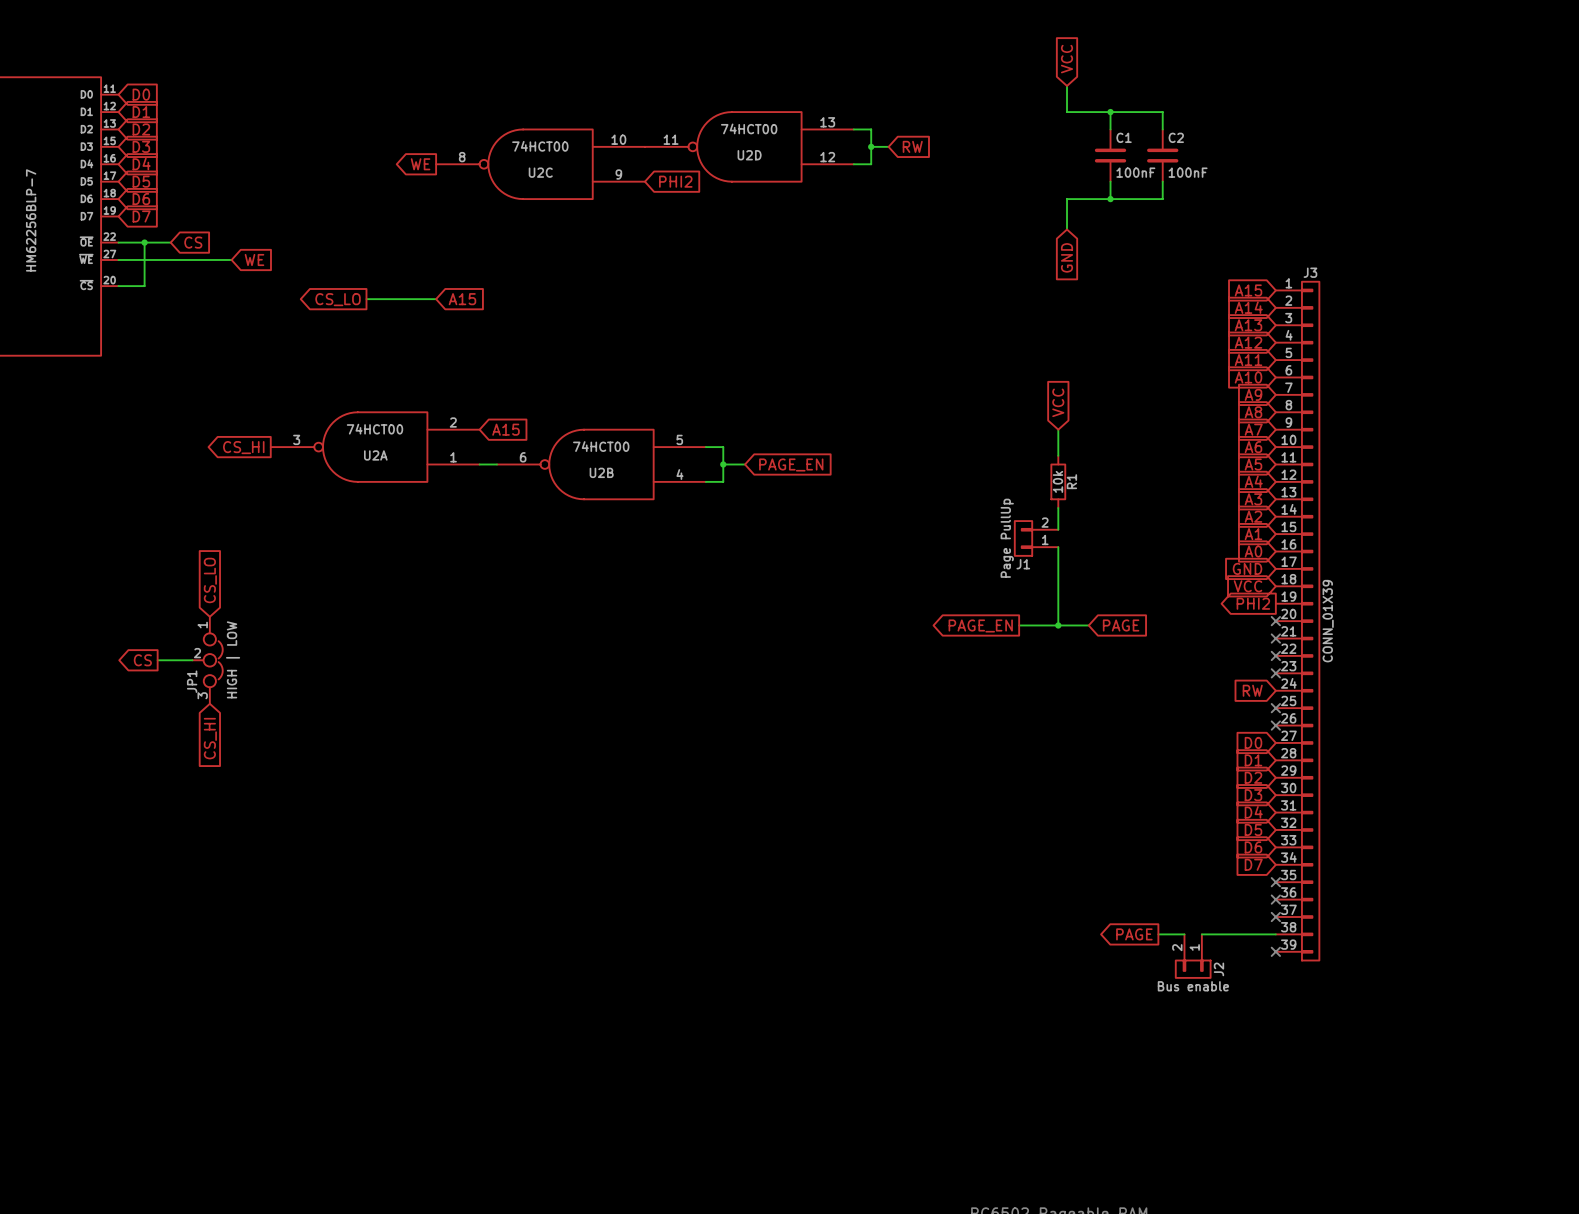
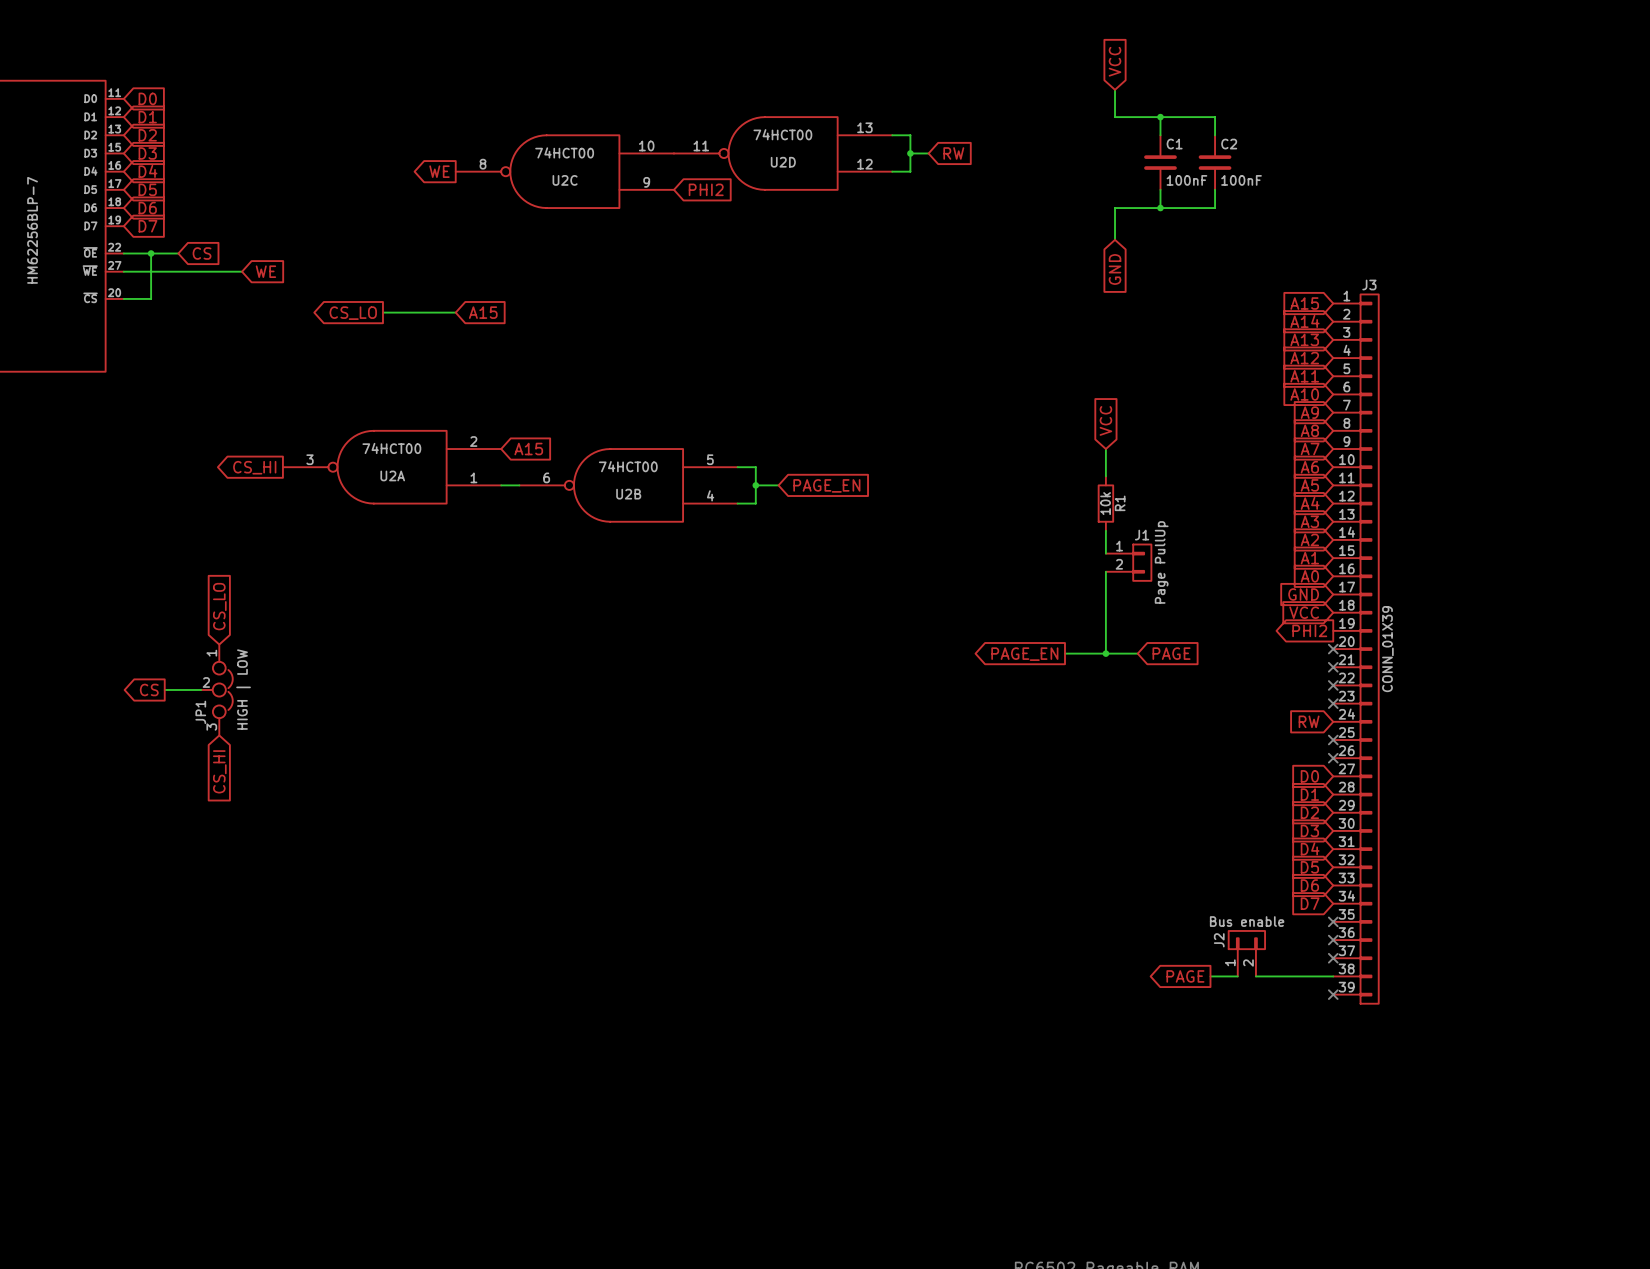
J1 rotation: 0° (1023, 538) -> 180° (1142, 562)
J1 position: (1036, 538) -> (1128, 562)
J2 position: (1193, 956) -> (1246, 953)
J2 rotation: 0° (1193, 969) -> 180° (1246, 940)

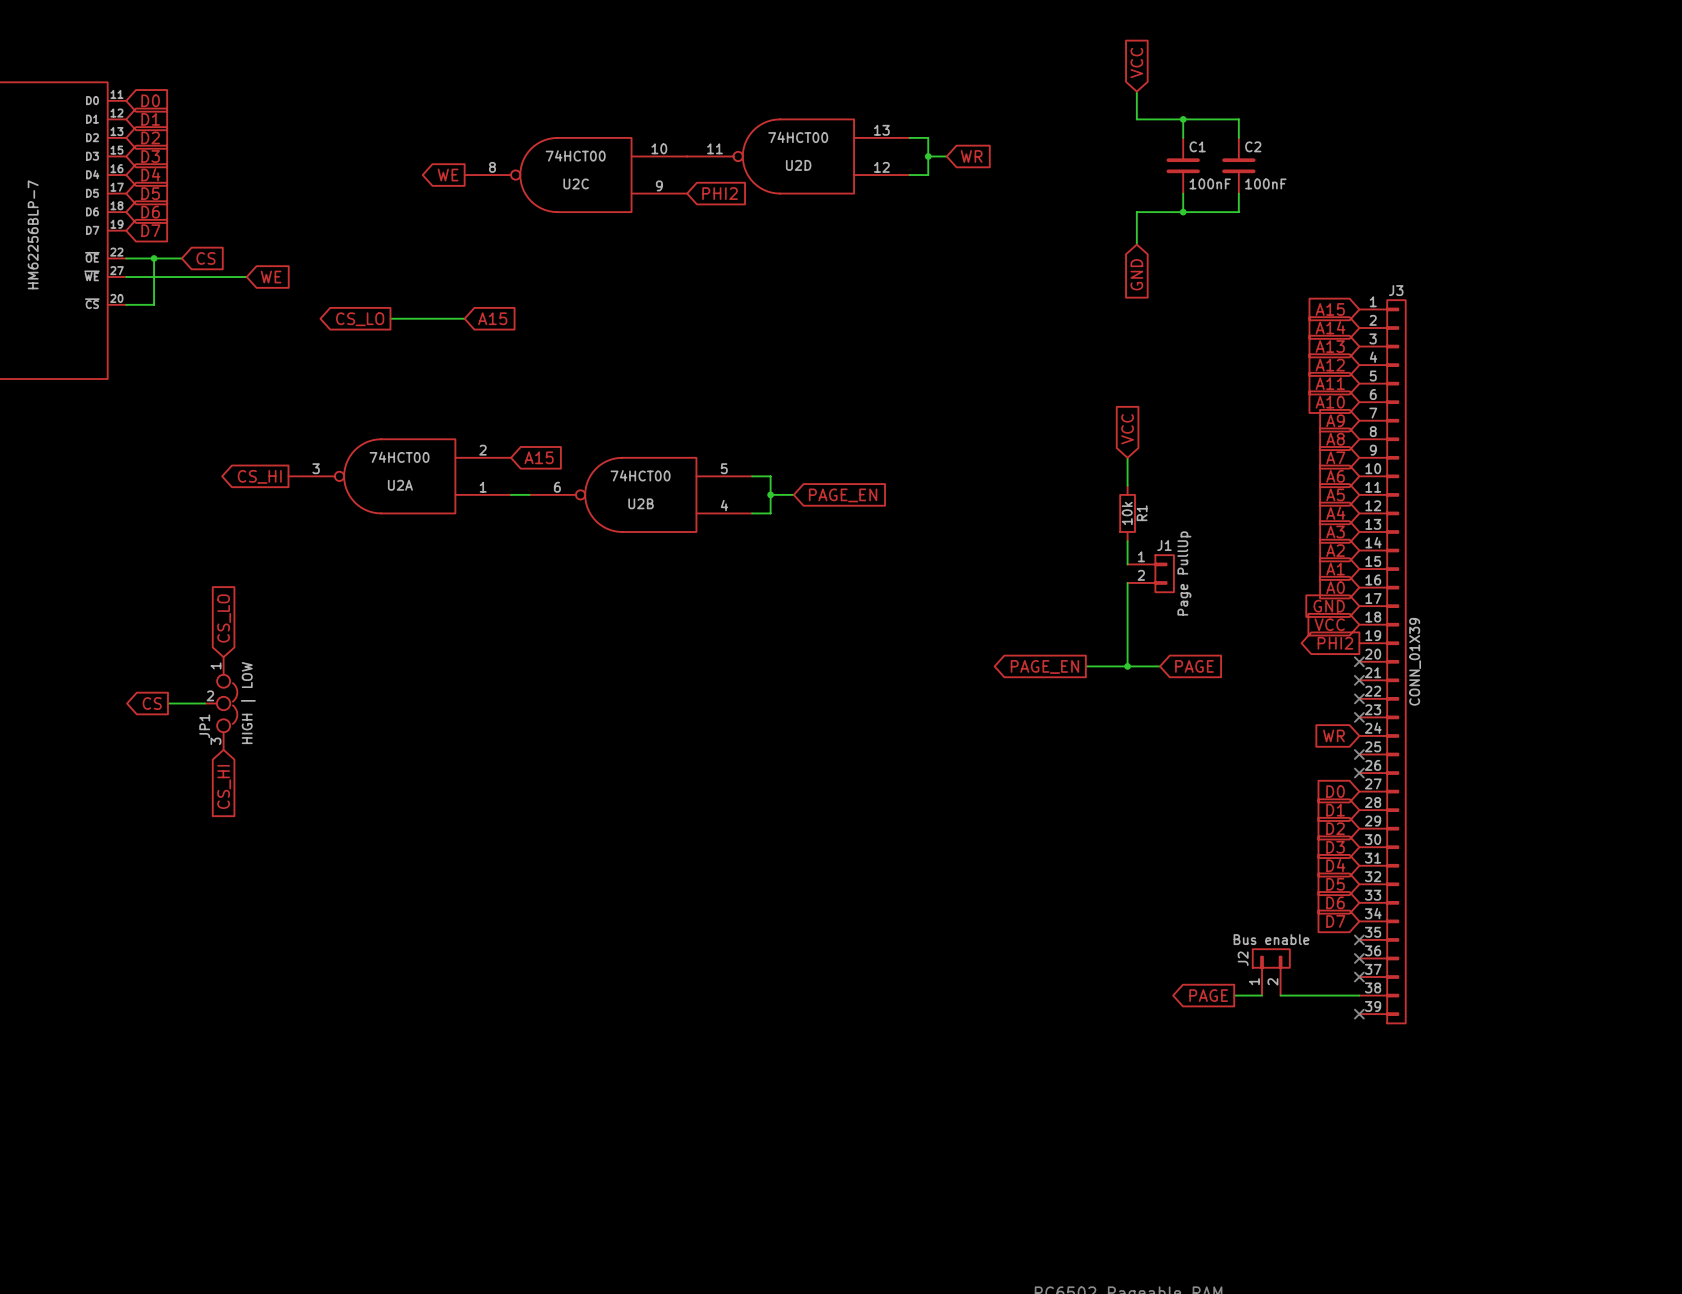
global label: RW (953, 153) -> WR (971, 156)
global label: RW (1309, 721) -> WR (1333, 735)

